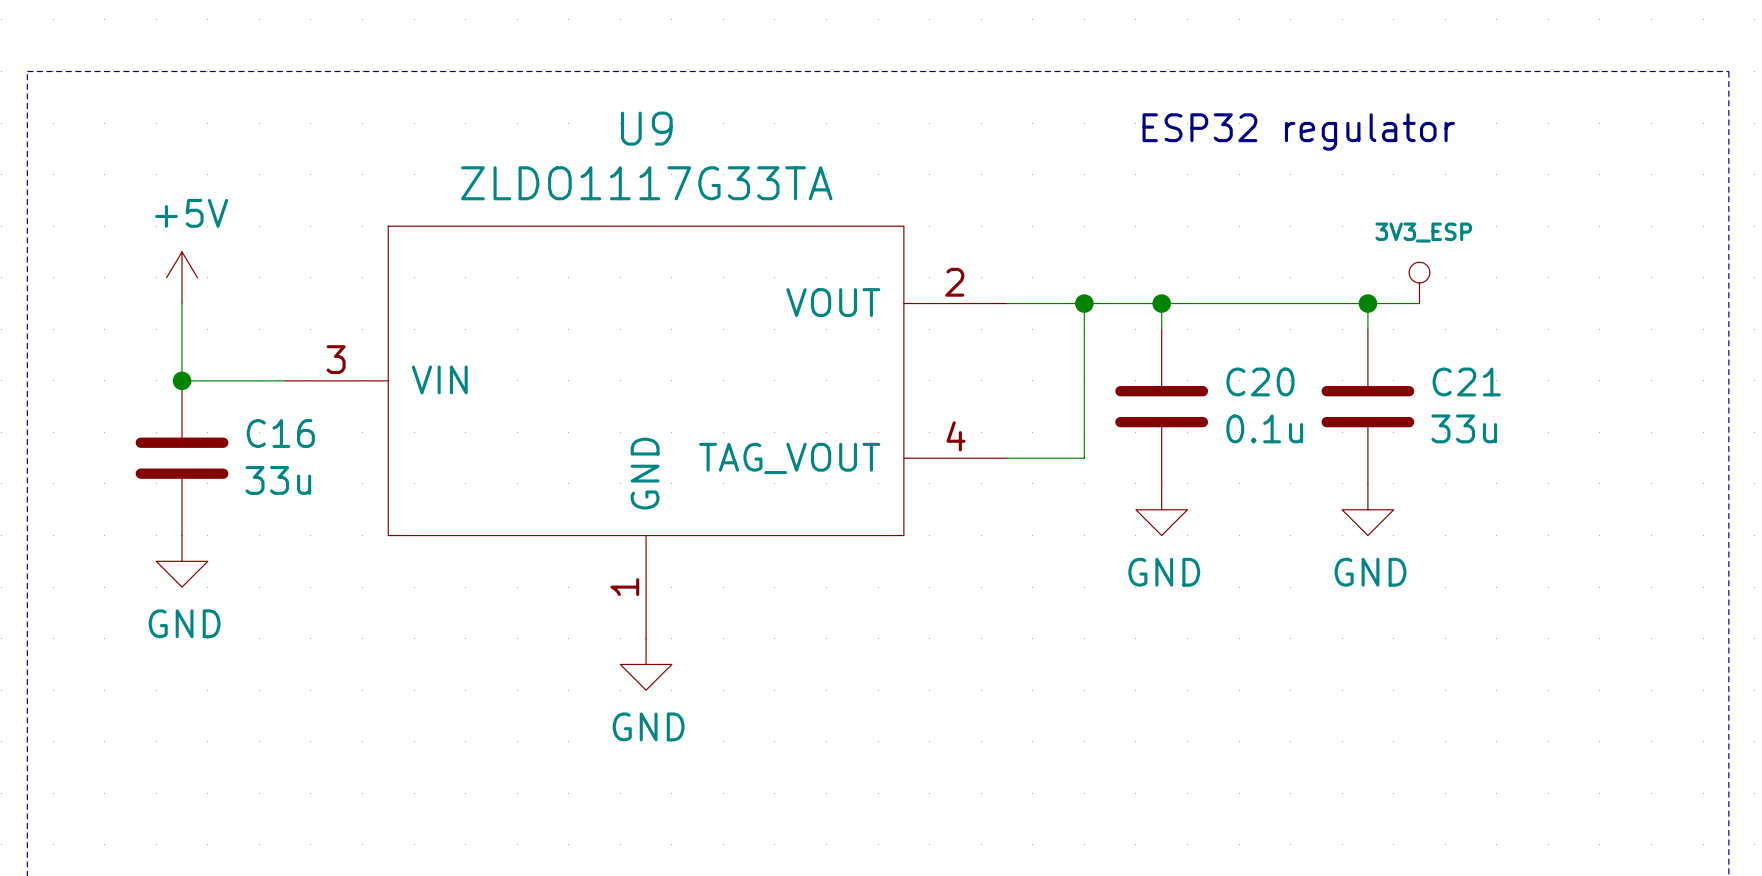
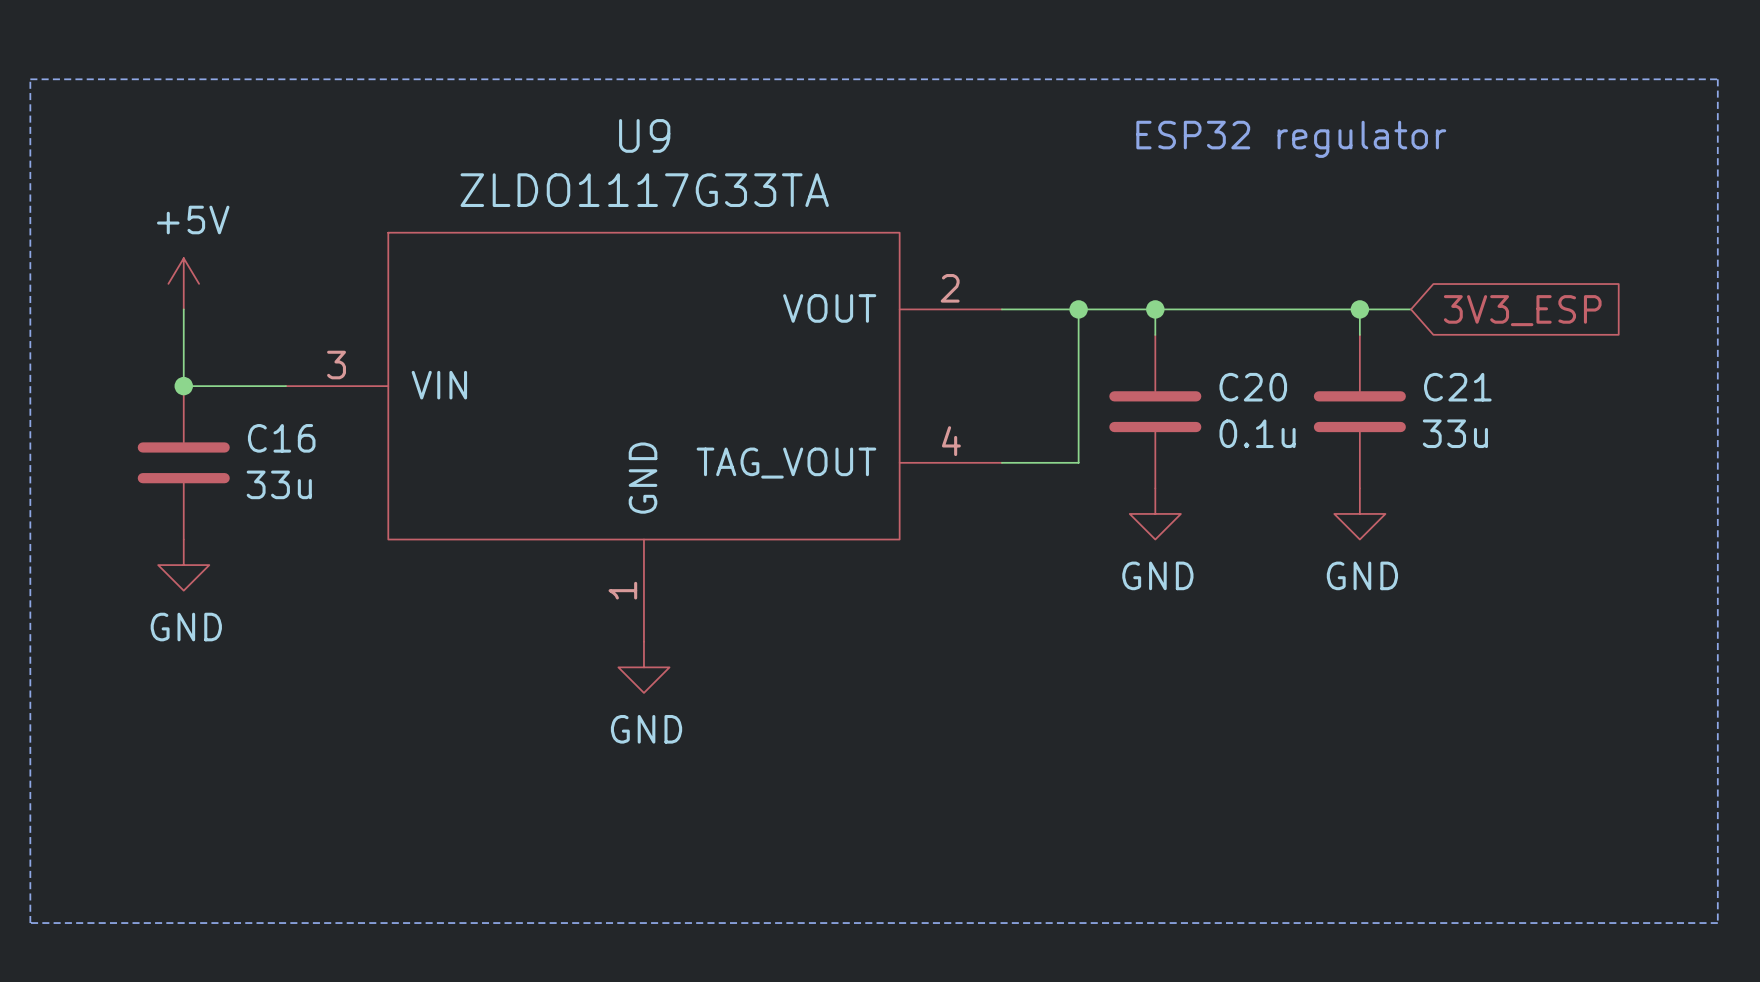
power symbol: 3V3_ESP (1419, 282) -> none
global label: none -> 3V3_ESP (1522, 310)

